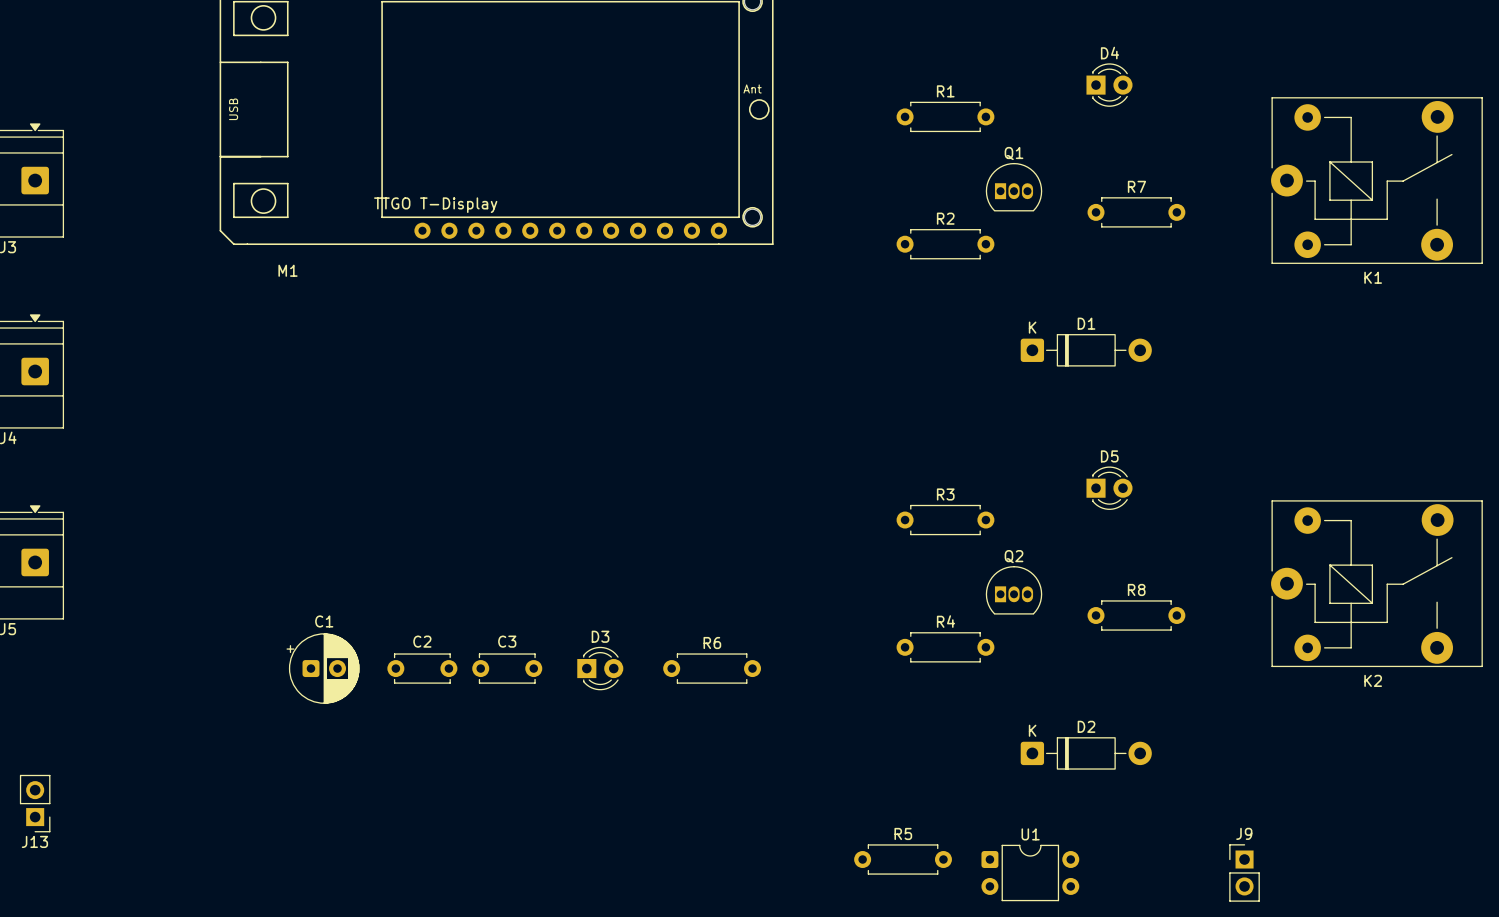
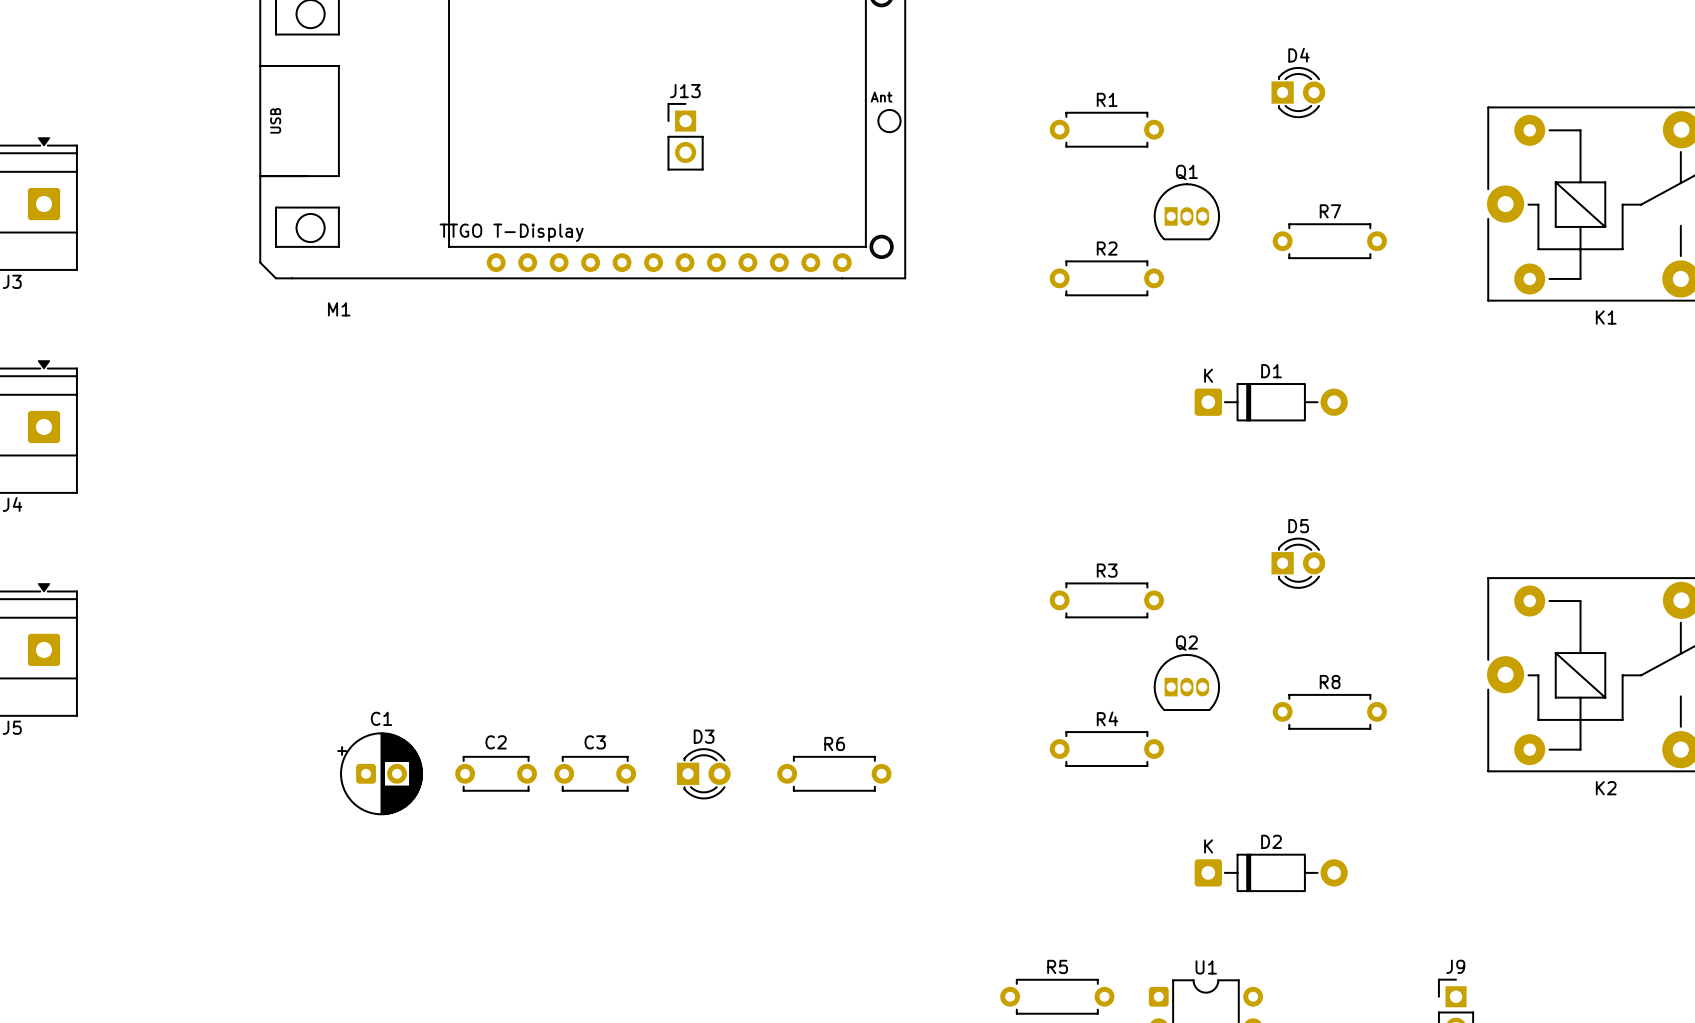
J13 rotation: 0° (35, 803) -> 180° (685, 136)
J13 position: (35, 803) -> (685, 136)

